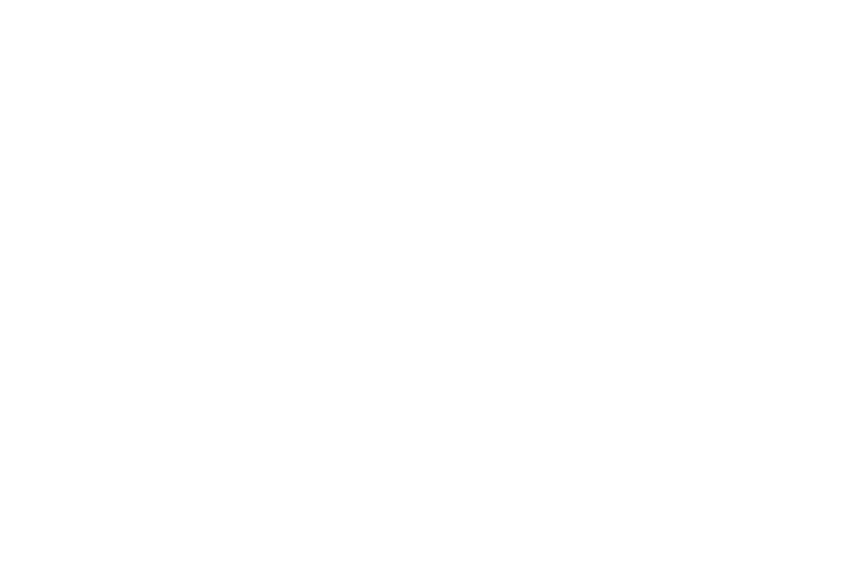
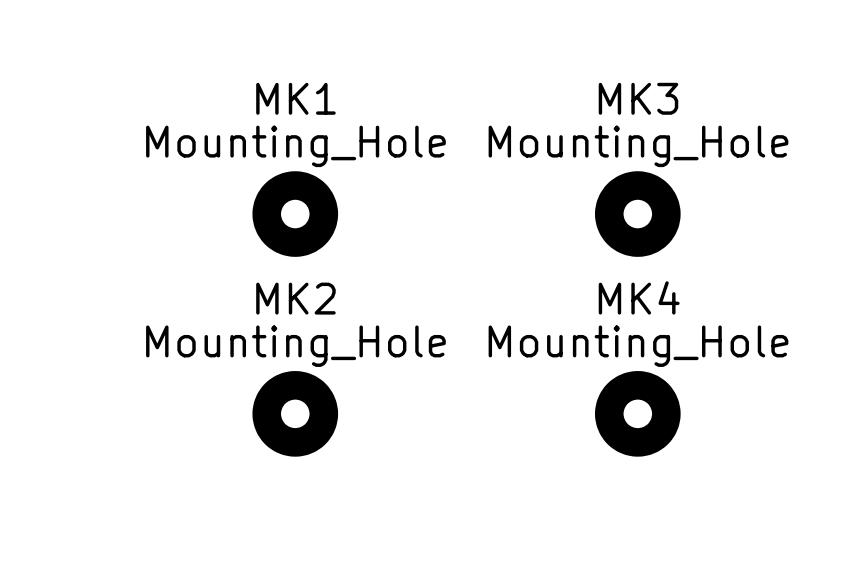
MK1: none -> Mounting_Hole (295, 214)
MK3: none -> Mounting_Hole (637, 214)
MK2: none -> Mounting_Hole (295, 413)
MK4: none -> Mounting_Hole (637, 413)

